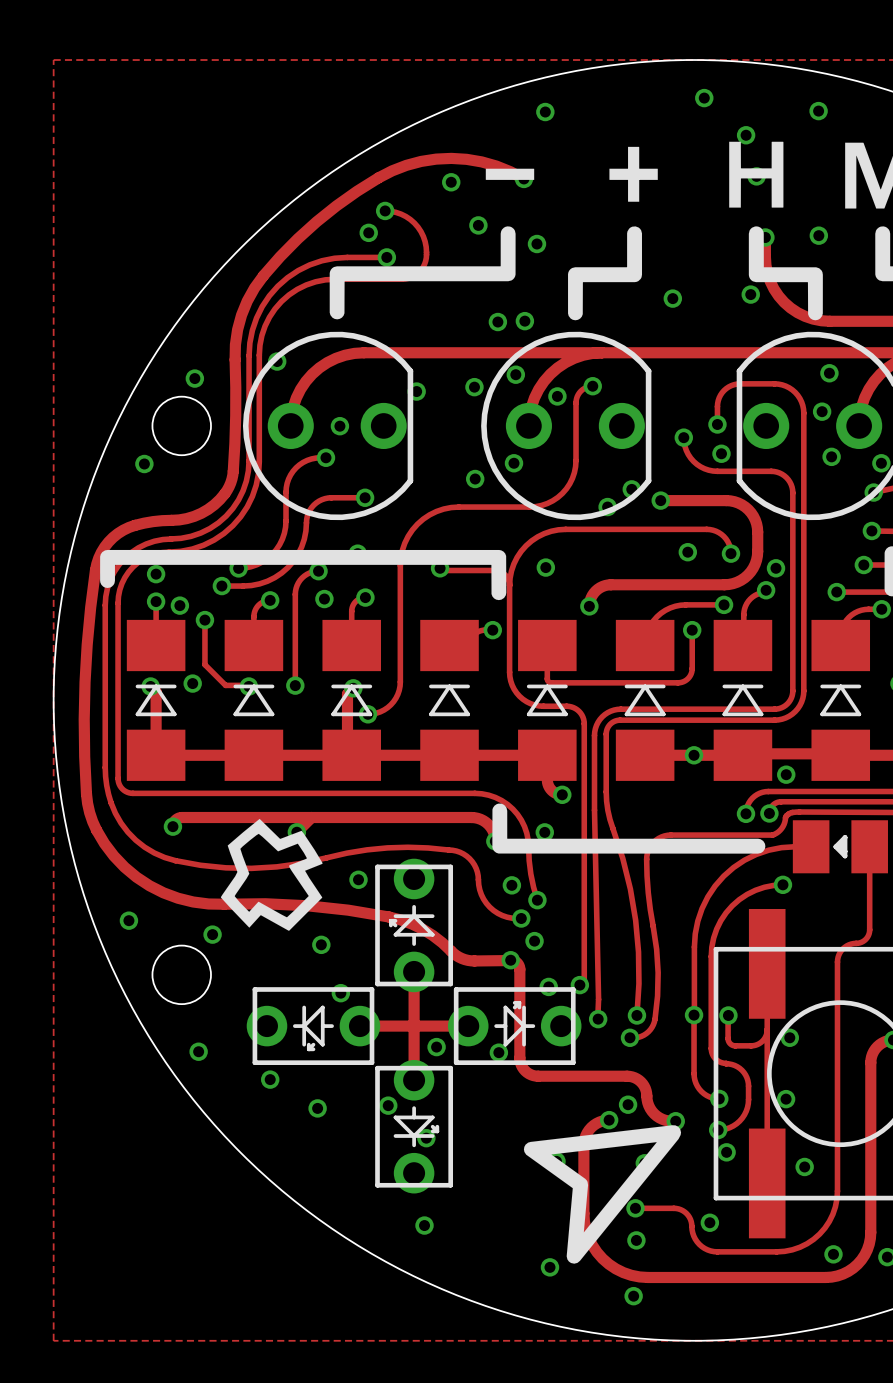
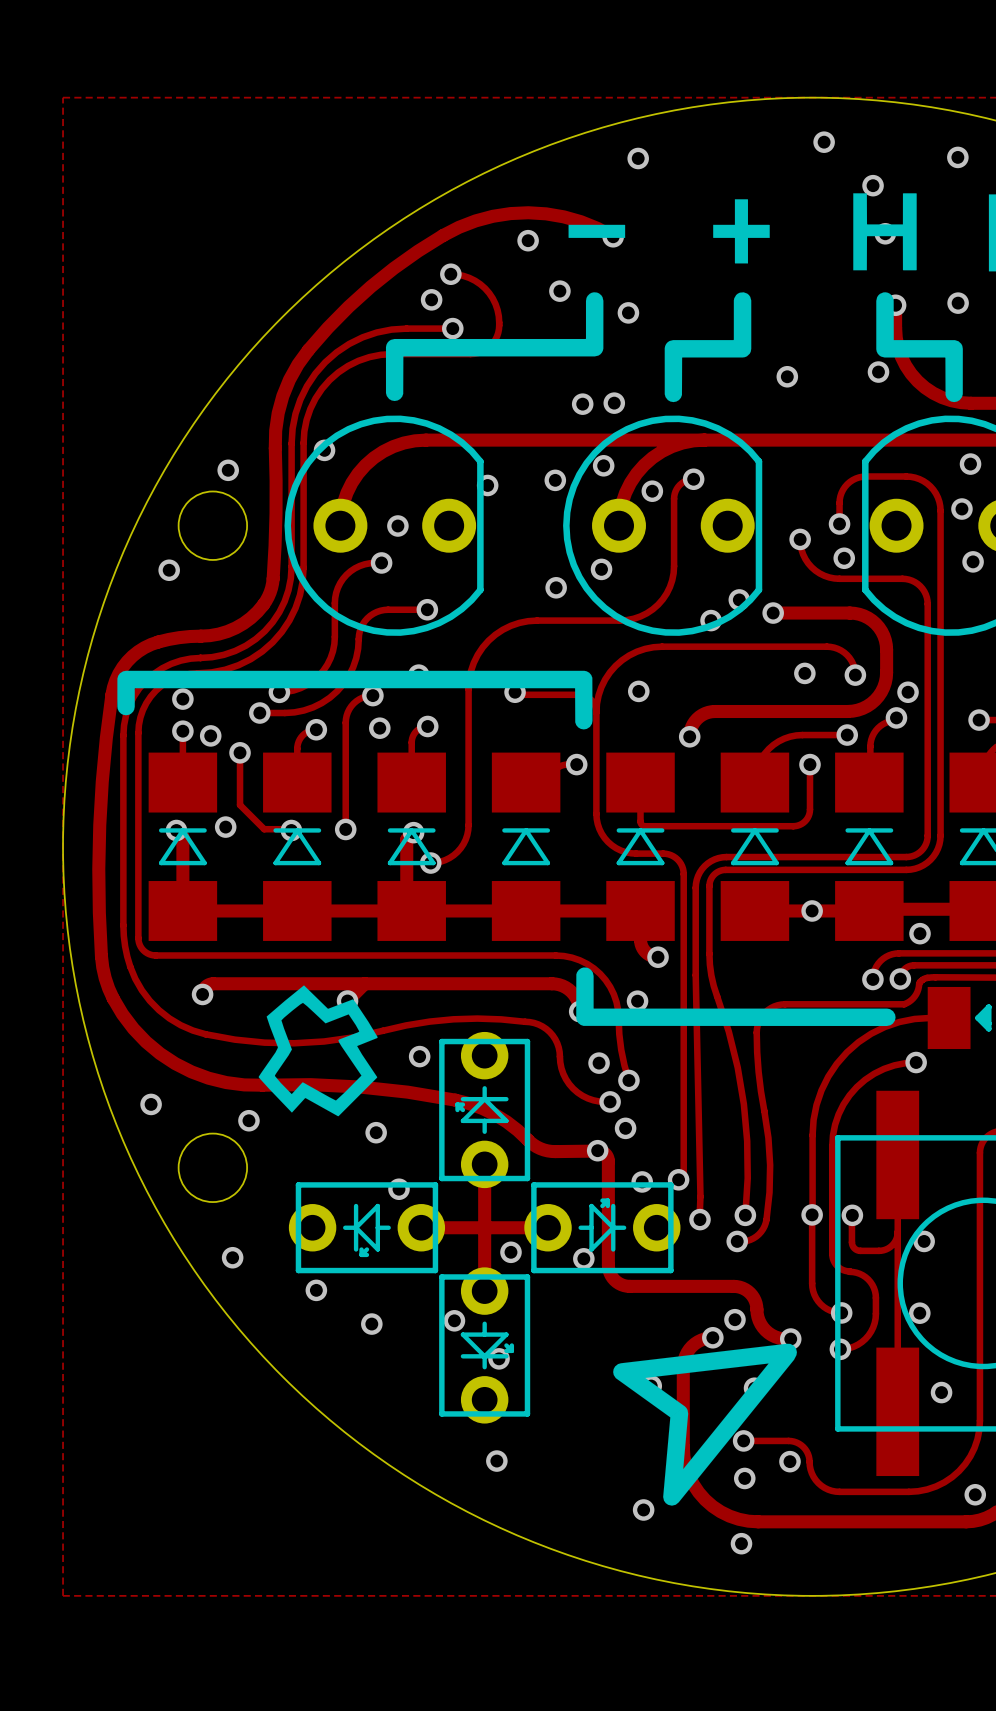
via: (726, 1152) -> none
via position: (709, 1222) -> (789, 1461)

